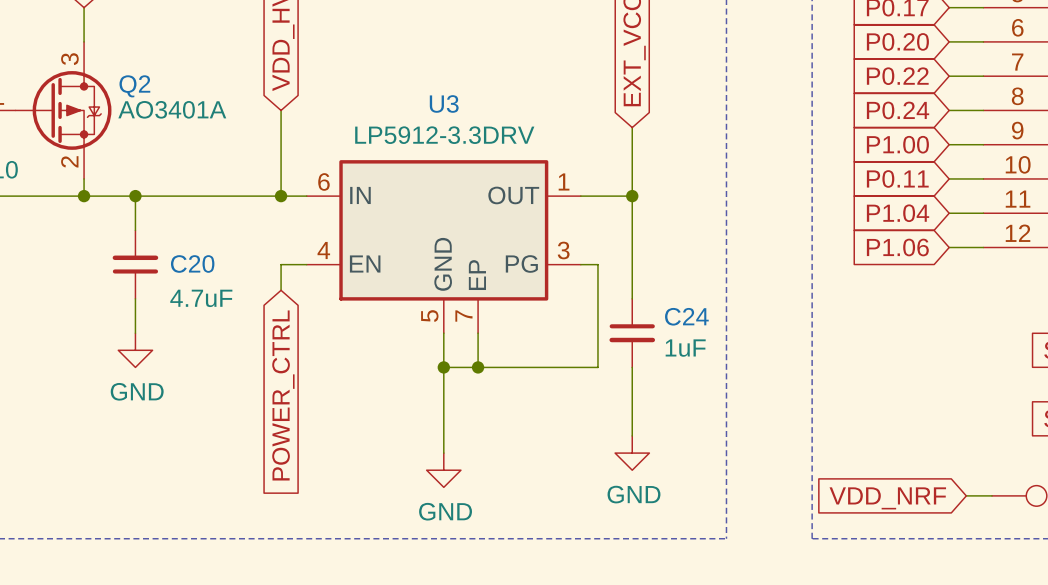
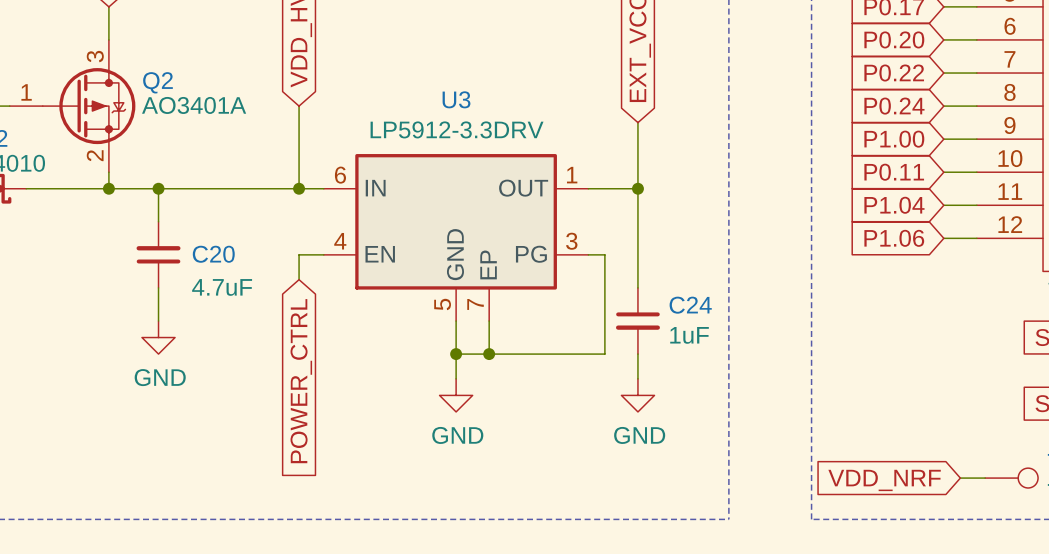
wire: (443, 393) (443, 453) -> none
wire: (632, 393) (632, 435) -> none
power symbol position: GND (632, 453) -> GND (637, 395)
power symbol position: GND (443, 470) -> GND (456, 395)

